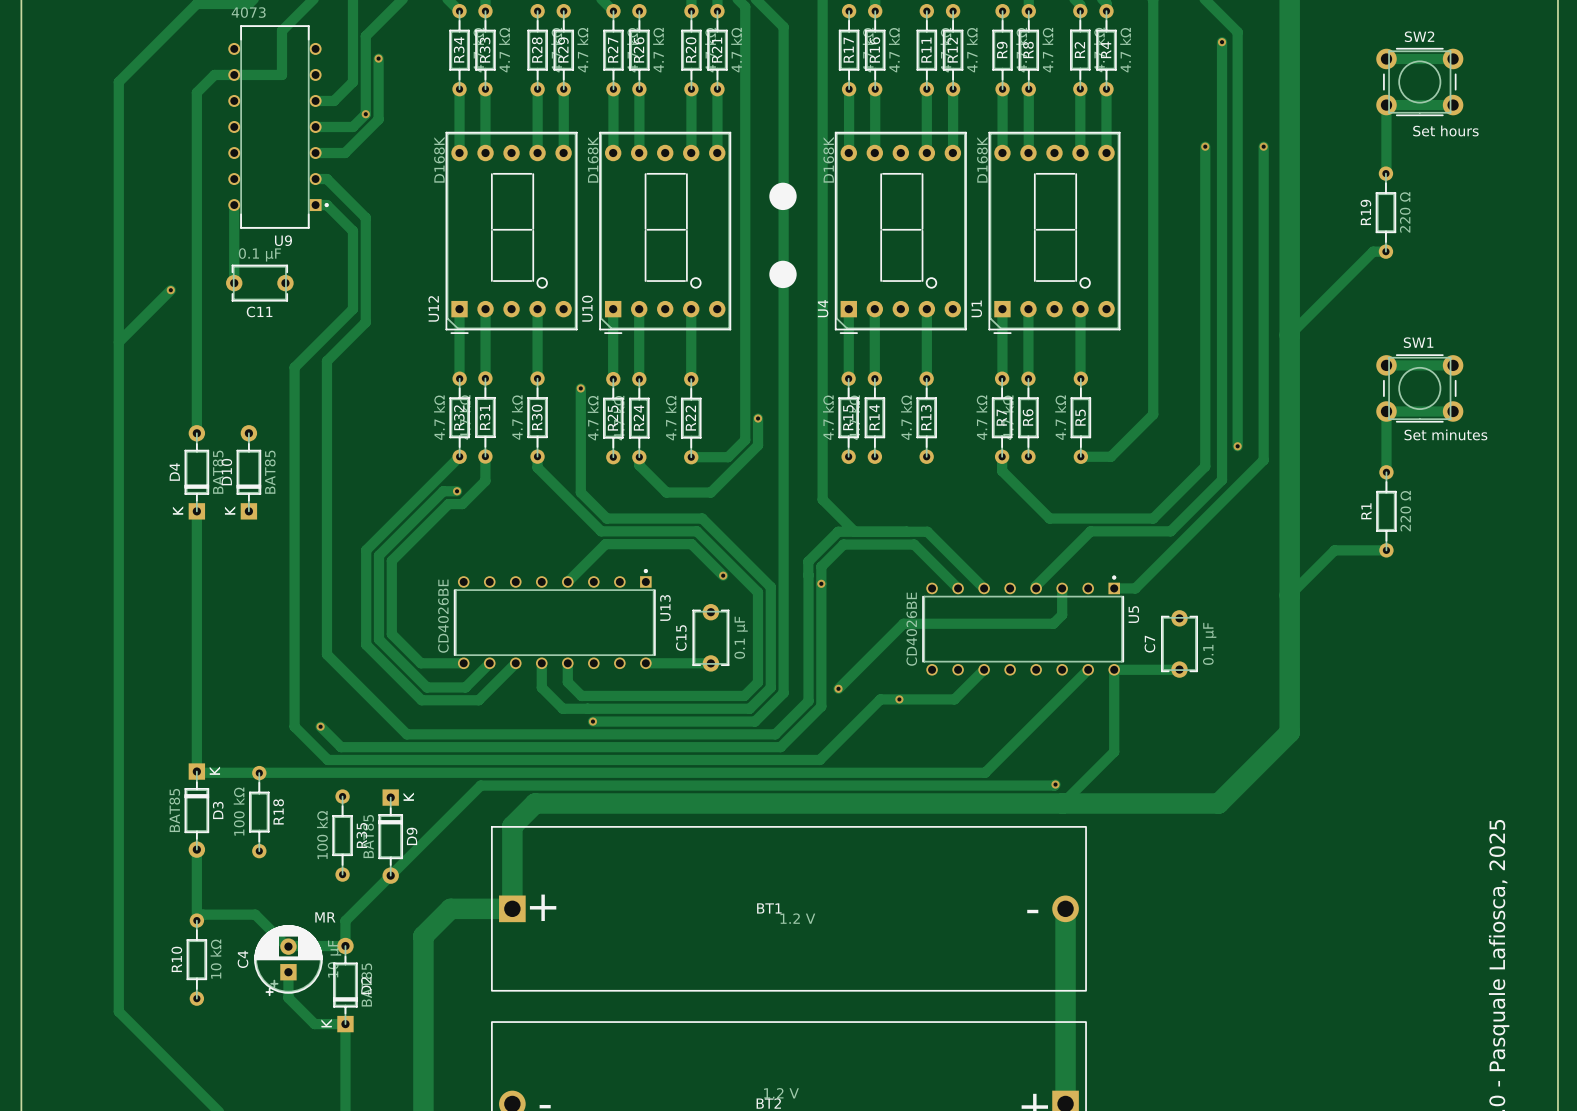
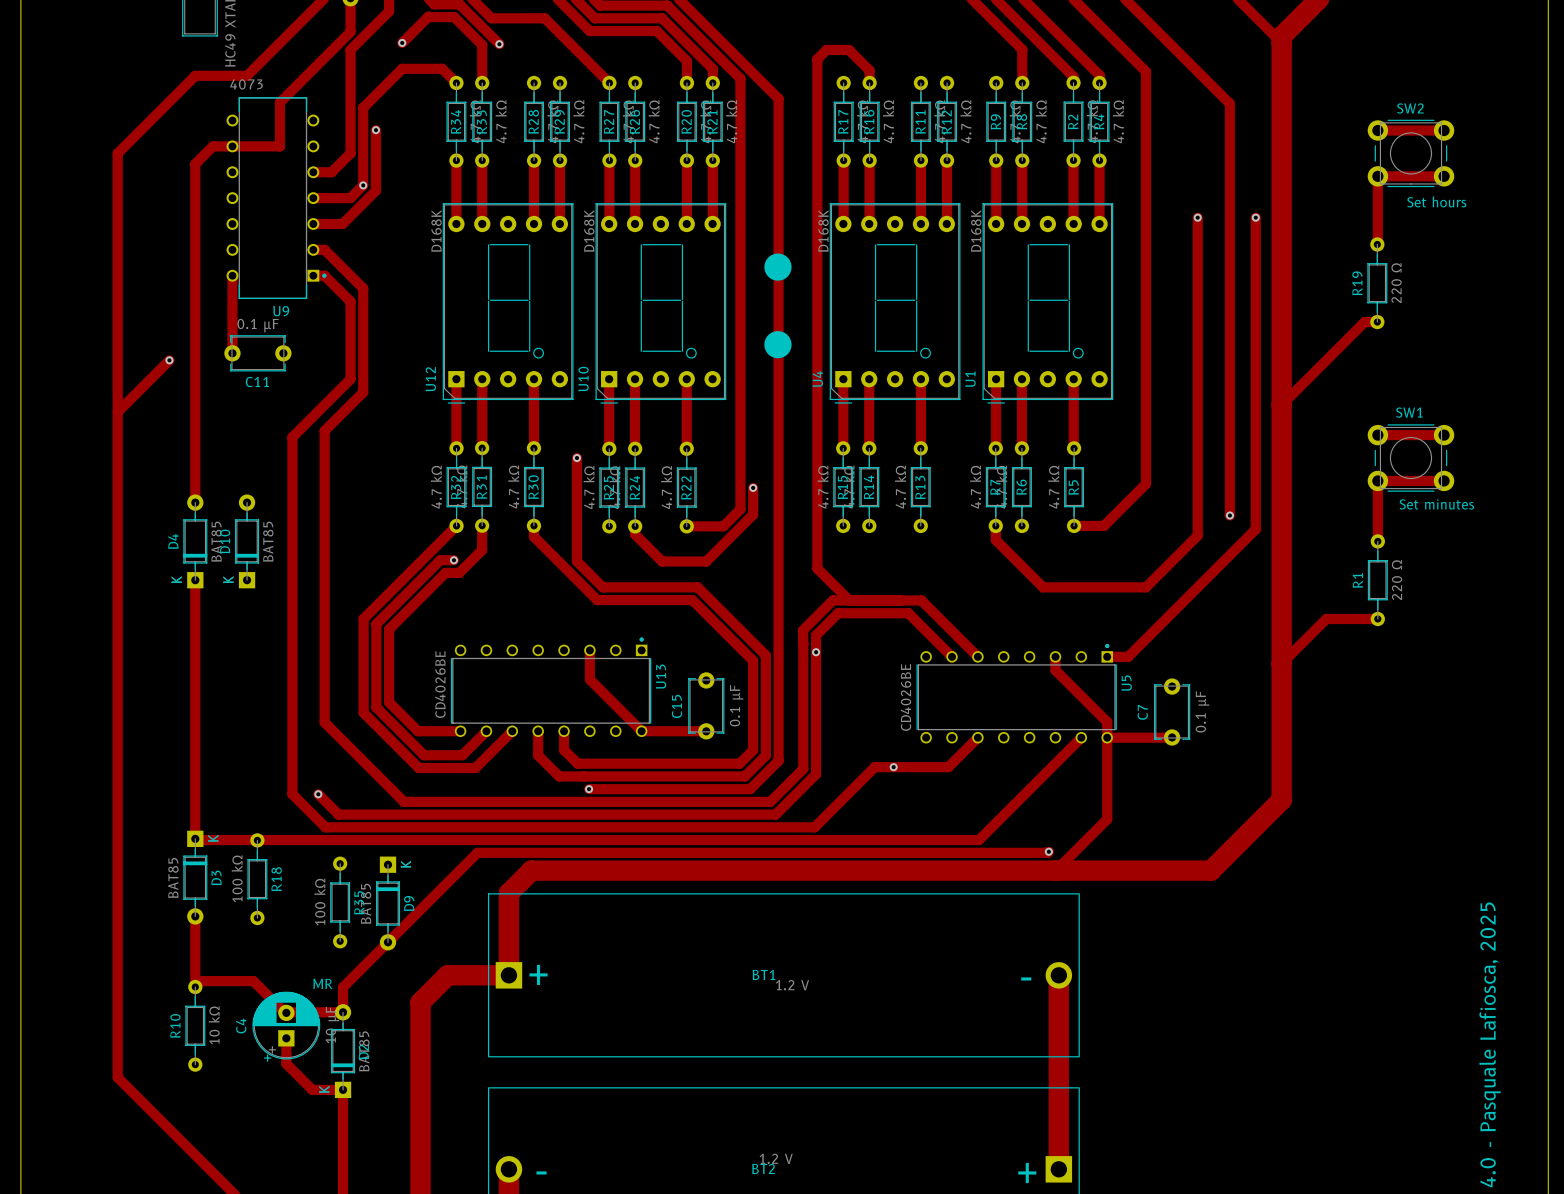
track: (1222, 42) (1222, 480) (1170, 531) (1090, 531) (1035, 586) (1036, 588) -> none
via: (1222, 42) -> none
track: (723, 575) (691, 544) (605, 544) (567, 581) -> none
via: (723, 575) -> none
track: none -> (589, 650) (589, 679) (641, 731)
track: (1062, 602) (1062, 615) (1053, 623) (903, 623) (838, 688) -> (1055, 670) (1107, 722) (1107, 737)
via: (838, 688) -> none

